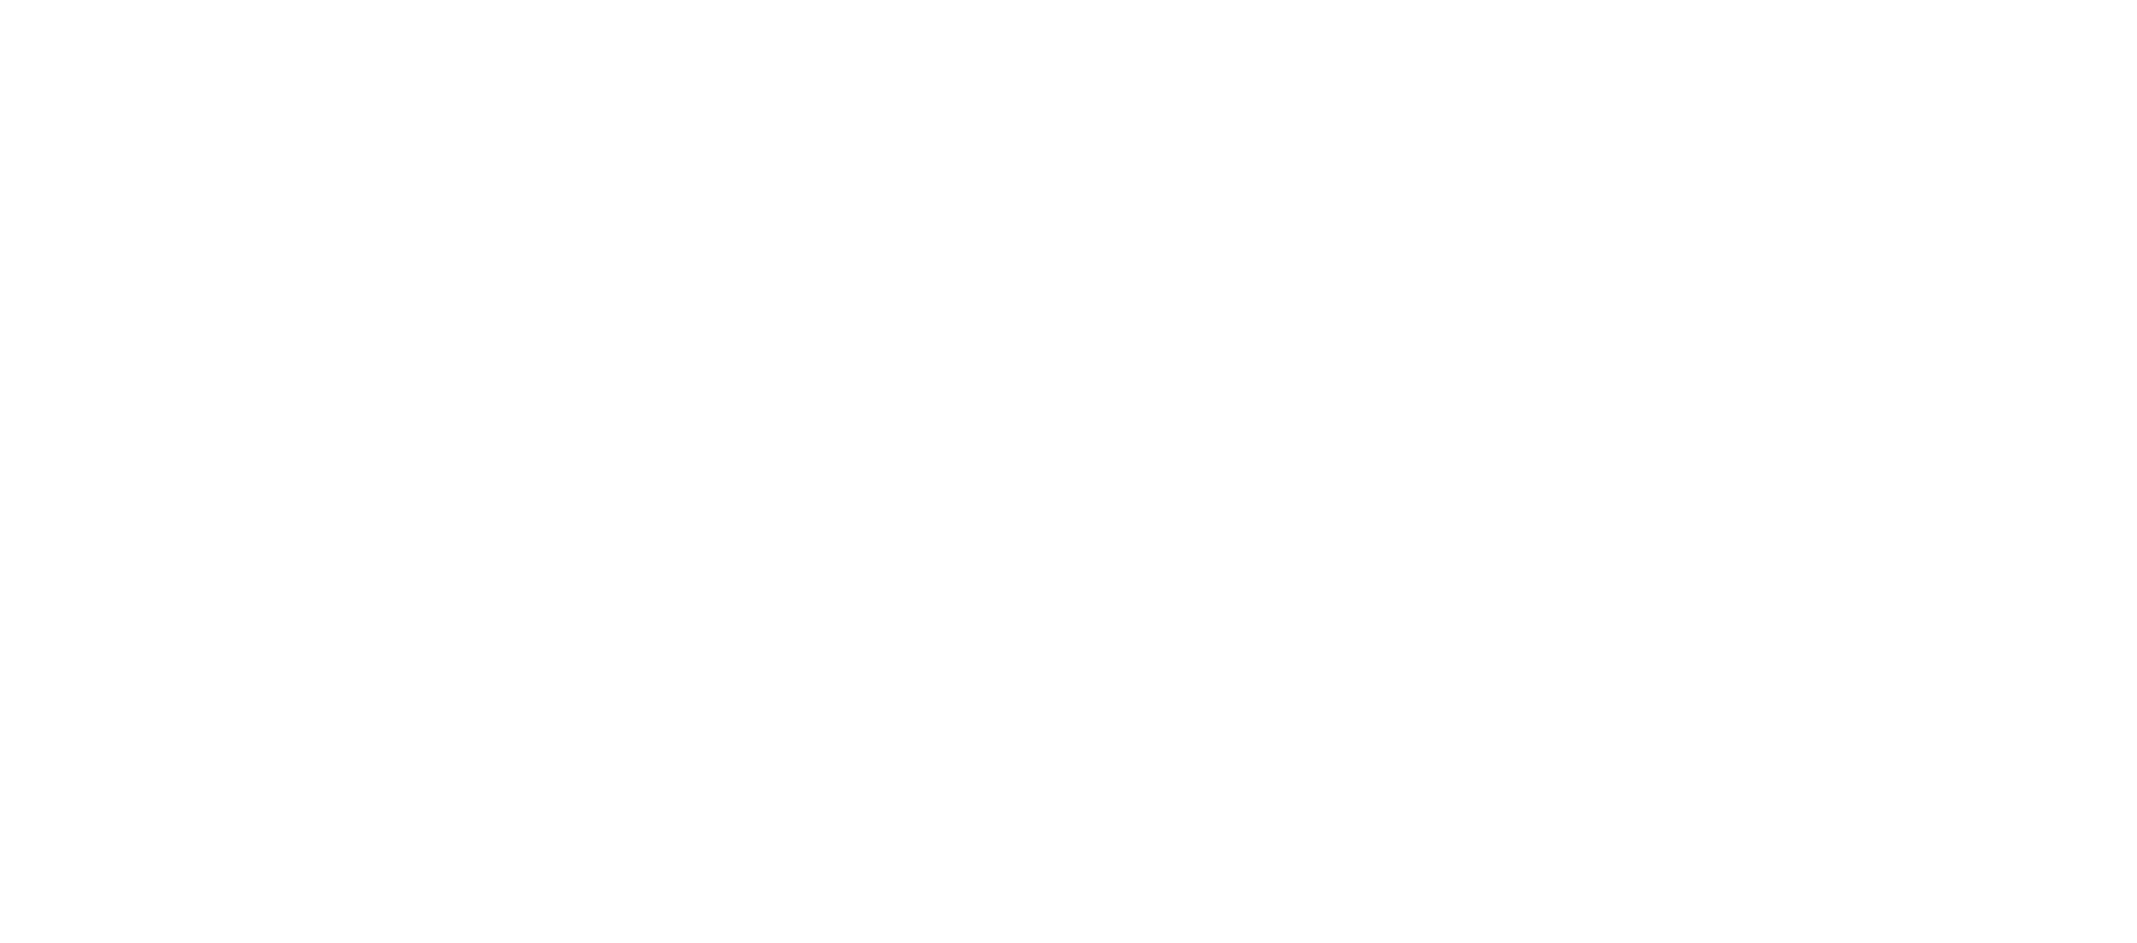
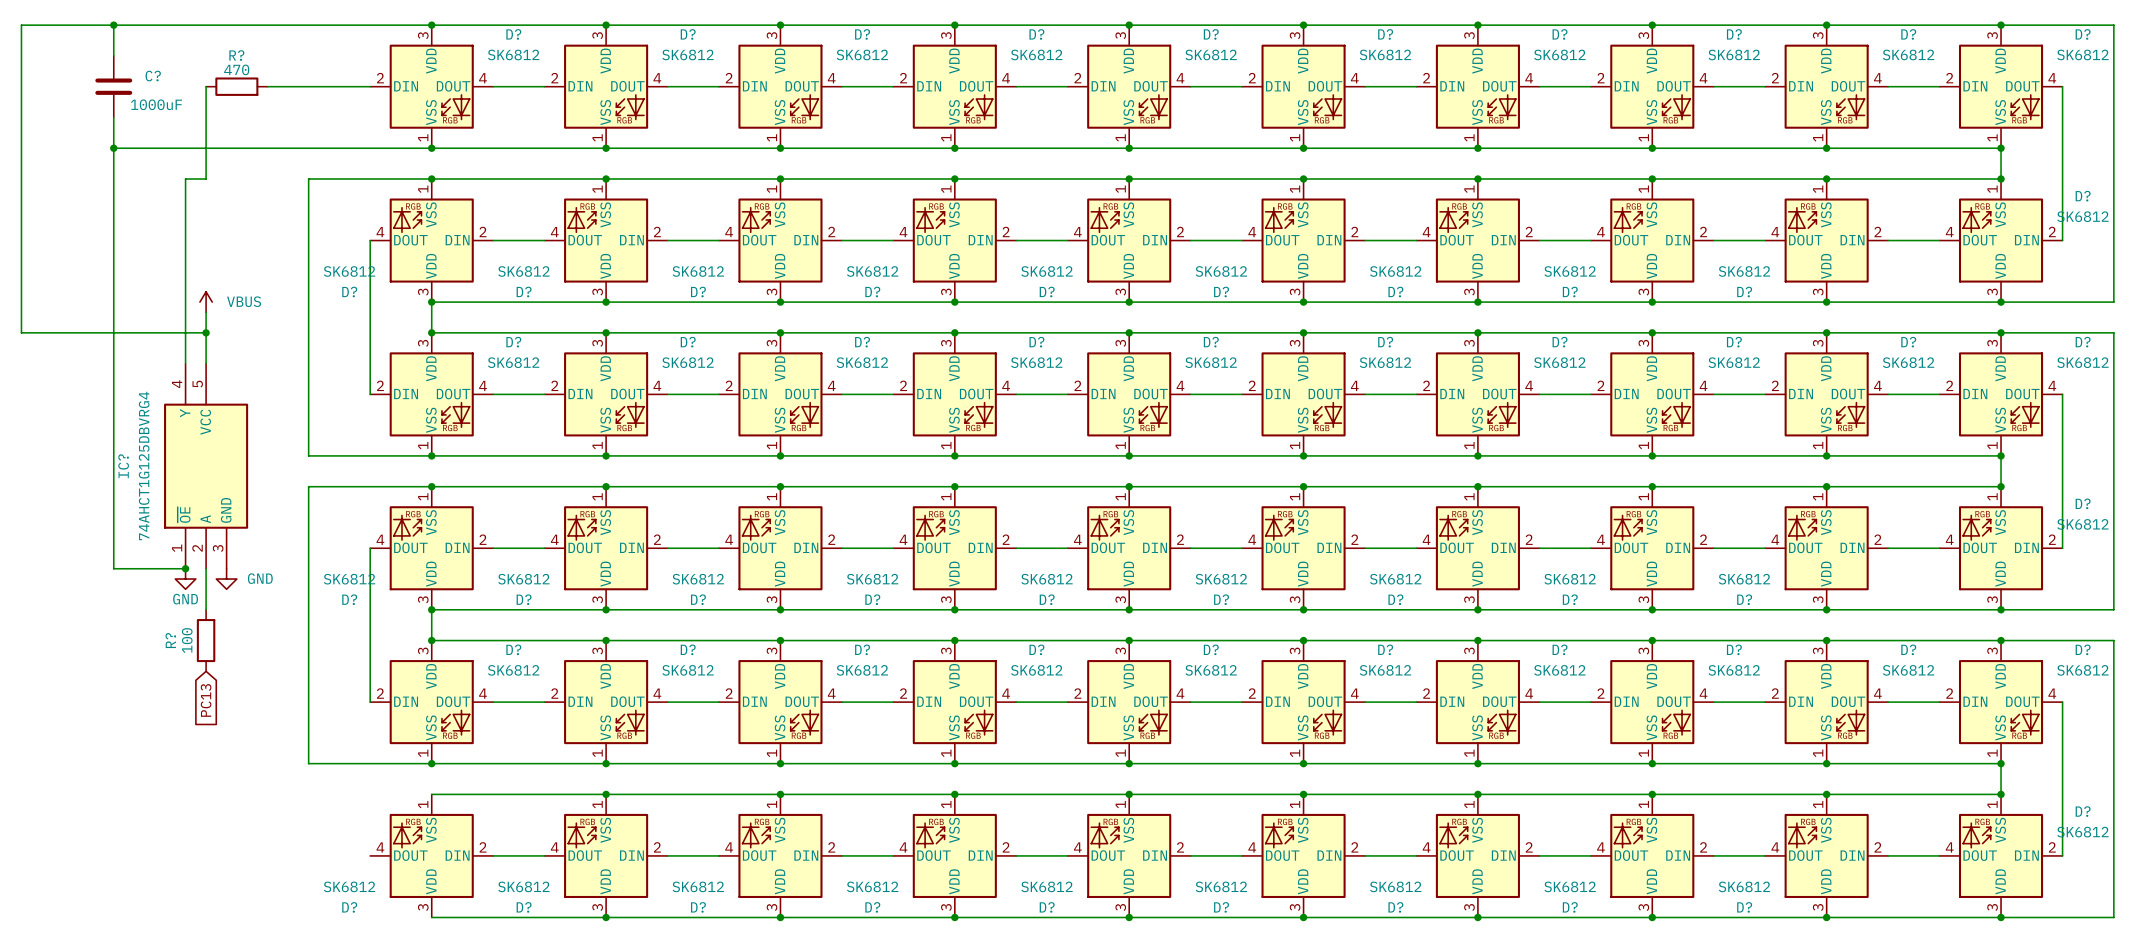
wire: none -> (113, 25) (113, 55)
junction: none -> (113, 25)
junction: none -> (431, 25)
junction: none -> (606, 25)
junction: none -> (780, 25)
junction: none -> (954, 25)
junction: none -> (1129, 25)
junction: none -> (1303, 25)
junction: none -> (1477, 25)
junction: none -> (1652, 25)
junction: none -> (1826, 25)
junction: none -> (2001, 25)
C?: none -> 1000uF (113, 86)
wire: none -> (206, 86) (206, 179) (185, 179) (185, 363)
R?: none -> 470 (236, 86)
wire: none -> (267, 86) (370, 86)
D?: none -> SK6812 (431, 86)
wire: none -> (493, 86) (544, 86)
D?: none -> SK6812 (606, 86)
wire: none -> (667, 86) (718, 86)
D?: none -> SK6812 (780, 86)
wire: none -> (842, 86) (893, 86)
D?: none -> SK6812 (954, 86)
wire: none -> (1016, 86) (1067, 86)
D?: none -> SK6812 (1129, 86)
wire: none -> (1190, 86) (1242, 86)
D?: none -> SK6812 (1303, 86)
wire: none -> (1365, 86) (1416, 86)
D?: none -> SK6812 (1477, 86)
wire: none -> (1539, 86) (1590, 86)
D?: none -> SK6812 (1652, 86)
wire: none -> (1713, 86) (1765, 86)
D?: none -> SK6812 (1826, 86)
wire: none -> (1888, 86) (1939, 86)
D?: none -> SK6812 (2001, 86)
wire: none -> (2062, 86) (2062, 240)
wire: none -> (113, 117) (113, 568) (185, 568)
wire: none -> (113, 148) (2001, 148) (2001, 179) (308, 179) (308, 455) (2001, 455) (2001, 486) (308, 486) (308, 763) (2001, 763) (2001, 794) (431, 794)
junction: none -> (113, 148)
junction: none -> (431, 148)
junction: none -> (606, 148)
junction: none -> (780, 148)
junction: none -> (954, 148)
junction: none -> (1129, 148)
junction: none -> (1303, 148)
junction: none -> (1477, 148)
junction: none -> (1652, 148)
junction: none -> (1826, 148)
junction: none -> (2001, 148)
junction: none -> (431, 179)
junction: none -> (606, 179)
junction: none -> (780, 179)
junction: none -> (954, 179)
junction: none -> (1129, 179)
junction: none -> (1303, 179)
junction: none -> (1477, 179)
junction: none -> (1652, 179)
junction: none -> (1826, 179)
junction: none -> (2001, 179)
wire: none -> (370, 240) (370, 394)
D?: none -> SK6812 (431, 240)
wire: none -> (493, 240) (544, 240)
D?: none -> SK6812 (606, 240)
wire: none -> (667, 240) (718, 240)
D?: none -> SK6812 (780, 240)
wire: none -> (842, 240) (893, 240)
D?: none -> SK6812 (954, 240)
wire: none -> (1016, 240) (1067, 240)
D?: none -> SK6812 (1129, 240)
wire: none -> (1190, 240) (1242, 240)
D?: none -> SK6812 (1303, 240)
wire: none -> (1365, 240) (1416, 240)
D?: none -> SK6812 (1477, 240)
wire: none -> (1539, 240) (1590, 240)
D?: none -> SK6812 (1652, 240)
wire: none -> (1713, 240) (1765, 240)
D?: none -> SK6812 (1826, 240)
wire: none -> (1888, 240) (1939, 240)
D?: none -> SK6812 (2001, 240)
power symbol: none -> VBUS (206, 302)
junction: none -> (431, 302)
junction: none -> (606, 302)
junction: none -> (780, 302)
junction: none -> (954, 302)
junction: none -> (1129, 302)
junction: none -> (1303, 302)
junction: none -> (1477, 302)
junction: none -> (1652, 302)
junction: none -> (1826, 302)
junction: none -> (2001, 302)
wire: none -> (206, 312) (206, 363)
wire: none -> (206, 332) (21, 332) (21, 25) (2113, 25) (2113, 302) (431, 302) (431, 332) (2113, 332) (2113, 609) (431, 609) (431, 640) (2113, 640) (2113, 917) (431, 917)
junction: none -> (206, 332)
junction: none -> (431, 332)
junction: none -> (606, 332)
junction: none -> (780, 332)
junction: none -> (954, 332)
junction: none -> (1129, 332)
junction: none -> (1303, 332)
junction: none -> (1477, 332)
junction: none -> (1652, 332)
junction: none -> (1826, 332)
junction: none -> (2001, 332)
D?: none -> SK6812 (431, 394)
wire: none -> (493, 394) (544, 394)
D?: none -> SK6812 (606, 394)
wire: none -> (667, 394) (718, 394)
D?: none -> SK6812 (780, 394)
wire: none -> (842, 394) (893, 394)
D?: none -> SK6812 (954, 394)
wire: none -> (1016, 394) (1067, 394)
D?: none -> SK6812 (1129, 394)
wire: none -> (1190, 394) (1242, 394)
D?: none -> SK6812 (1303, 394)
wire: none -> (1365, 394) (1416, 394)
D?: none -> SK6812 (1477, 394)
wire: none -> (1539, 394) (1590, 394)
D?: none -> SK6812 (1652, 394)
wire: none -> (1713, 394) (1765, 394)
D?: none -> SK6812 (1826, 394)
wire: none -> (1888, 394) (1939, 394)
D?: none -> SK6812 (2001, 394)
wire: none -> (2062, 394) (2062, 548)
junction: none -> (431, 455)
junction: none -> (606, 455)
junction: none -> (780, 455)
junction: none -> (954, 455)
junction: none -> (1129, 455)
junction: none -> (1303, 455)
junction: none -> (1477, 455)
junction: none -> (1652, 455)
junction: none -> (1826, 455)
junction: none -> (2001, 455)
IC?: none -> 74AHCT1G125DBVRG4 (206, 466)
junction: none -> (431, 486)
junction: none -> (606, 486)
junction: none -> (780, 486)
junction: none -> (954, 486)
junction: none -> (1129, 486)
junction: none -> (1303, 486)
junction: none -> (1477, 486)
junction: none -> (1652, 486)
junction: none -> (1826, 486)
junction: none -> (2001, 486)
wire: none -> (370, 548) (370, 702)
D?: none -> SK6812 (431, 548)
wire: none -> (493, 548) (544, 548)
D?: none -> SK6812 (606, 548)
wire: none -> (667, 548) (718, 548)
D?: none -> SK6812 (780, 548)
wire: none -> (842, 548) (893, 548)
D?: none -> SK6812 (954, 548)
wire: none -> (1016, 548) (1067, 548)
D?: none -> SK6812 (1129, 548)
wire: none -> (1190, 548) (1242, 548)
D?: none -> SK6812 (1303, 548)
wire: none -> (1365, 548) (1416, 548)
D?: none -> SK6812 (1477, 548)
wire: none -> (1539, 548) (1590, 548)
D?: none -> SK6812 (1652, 548)
wire: none -> (1713, 548) (1765, 548)
D?: none -> SK6812 (1826, 548)
wire: none -> (1888, 548) (1939, 548)
D?: none -> SK6812 (2001, 548)
junction: none -> (185, 568)
wire: none -> (206, 568) (206, 609)
power symbol: none -> GND (185, 579)
power symbol: none -> GND (226, 579)
junction: none -> (431, 609)
junction: none -> (606, 609)
junction: none -> (780, 609)
junction: none -> (954, 609)
junction: none -> (1129, 609)
junction: none -> (1303, 609)
junction: none -> (1477, 609)
junction: none -> (1652, 609)
junction: none -> (1826, 609)
junction: none -> (2001, 609)
R?: none -> 100 (206, 640)
junction: none -> (431, 640)
junction: none -> (606, 640)
junction: none -> (780, 640)
junction: none -> (954, 640)
junction: none -> (1129, 640)
junction: none -> (1303, 640)
junction: none -> (1477, 640)
junction: none -> (1652, 640)
junction: none -> (1826, 640)
junction: none -> (2001, 640)
global label: none -> PC13 (206, 700)
D?: none -> SK6812 (431, 702)
wire: none -> (493, 702) (544, 702)
D?: none -> SK6812 (606, 702)
wire: none -> (667, 702) (718, 702)
D?: none -> SK6812 (780, 702)
wire: none -> (842, 702) (893, 702)
D?: none -> SK6812 (954, 702)
wire: none -> (1016, 702) (1067, 702)
D?: none -> SK6812 (1129, 702)
wire: none -> (1190, 702) (1242, 702)
D?: none -> SK6812 (1303, 702)
wire: none -> (1365, 702) (1416, 702)
D?: none -> SK6812 (1477, 702)
wire: none -> (1539, 702) (1590, 702)
D?: none -> SK6812 (1652, 702)
wire: none -> (1713, 702) (1765, 702)
D?: none -> SK6812 (1826, 702)
wire: none -> (1888, 702) (1939, 702)
D?: none -> SK6812 (2001, 702)
wire: none -> (2062, 702) (2062, 855)
junction: none -> (431, 763)
junction: none -> (606, 763)
junction: none -> (780, 763)
junction: none -> (954, 763)
junction: none -> (1129, 763)
junction: none -> (1303, 763)
junction: none -> (1477, 763)
junction: none -> (1652, 763)
junction: none -> (1826, 763)
junction: none -> (2001, 763)
junction: none -> (606, 794)
junction: none -> (780, 794)
junction: none -> (954, 794)
junction: none -> (1129, 794)
junction: none -> (1303, 794)
junction: none -> (1477, 794)
junction: none -> (1652, 794)
junction: none -> (1826, 794)
junction: none -> (2001, 794)
D?: none -> SK6812 (431, 855)
wire: none -> (493, 855) (544, 855)
D?: none -> SK6812 (606, 855)
wire: none -> (667, 855) (718, 855)
D?: none -> SK6812 (780, 855)
wire: none -> (842, 855) (893, 855)
D?: none -> SK6812 (954, 855)
wire: none -> (1016, 855) (1067, 855)
D?: none -> SK6812 (1129, 855)
wire: none -> (1190, 855) (1242, 855)
D?: none -> SK6812 (1303, 855)
wire: none -> (1365, 855) (1416, 855)
D?: none -> SK6812 (1477, 855)
wire: none -> (1539, 855) (1590, 855)
D?: none -> SK6812 (1652, 855)
wire: none -> (1713, 855) (1765, 855)
D?: none -> SK6812 (1826, 855)
wire: none -> (1888, 855) (1939, 855)
D?: none -> SK6812 (2001, 855)
junction: none -> (606, 917)
junction: none -> (780, 917)
junction: none -> (954, 917)
junction: none -> (1129, 917)
junction: none -> (1303, 917)
junction: none -> (1477, 917)
junction: none -> (1652, 917)
junction: none -> (1826, 917)
junction: none -> (2001, 917)

